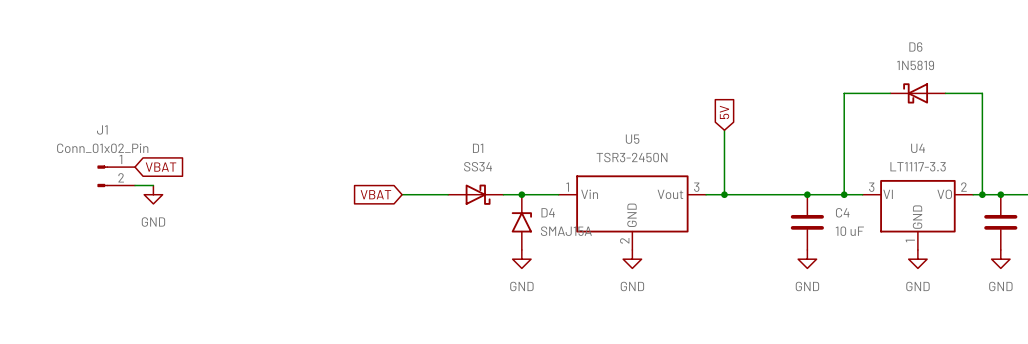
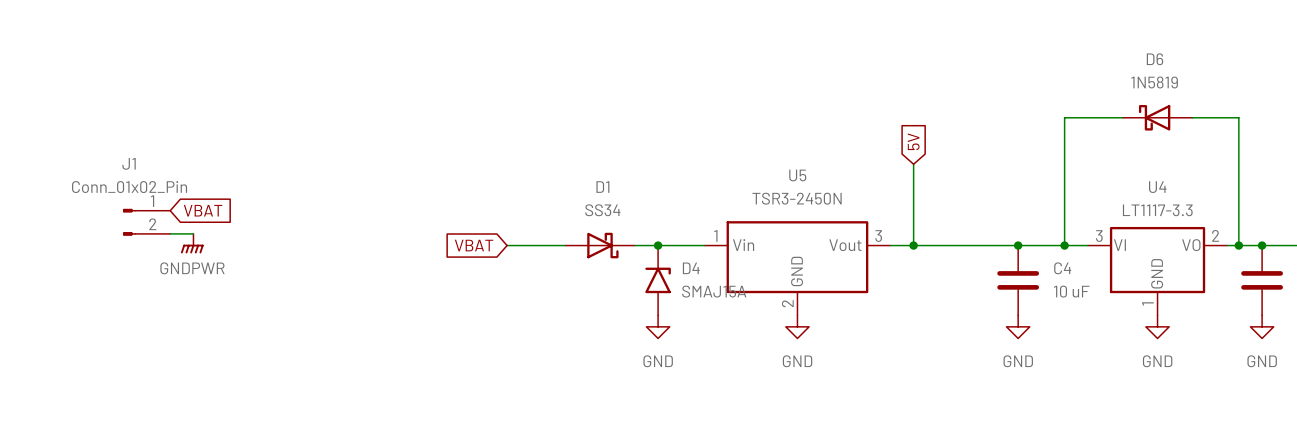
power symbol: GND (153, 194) -> GNDPWR (192, 243)

